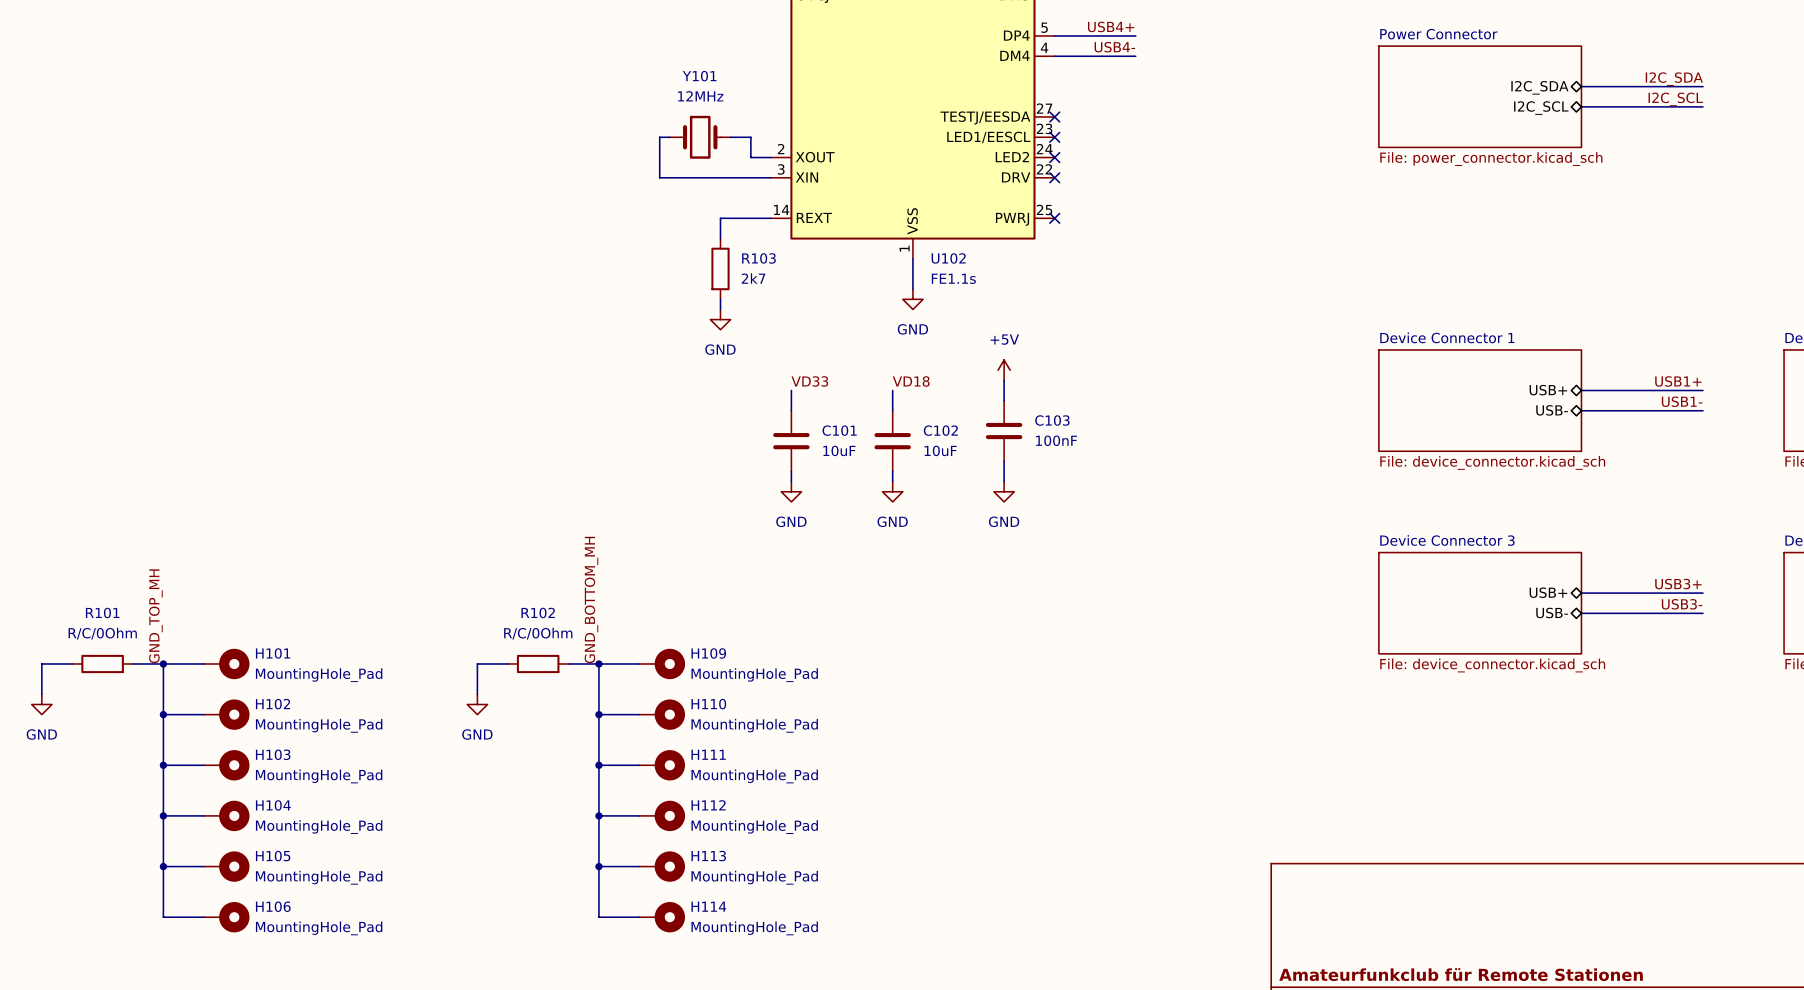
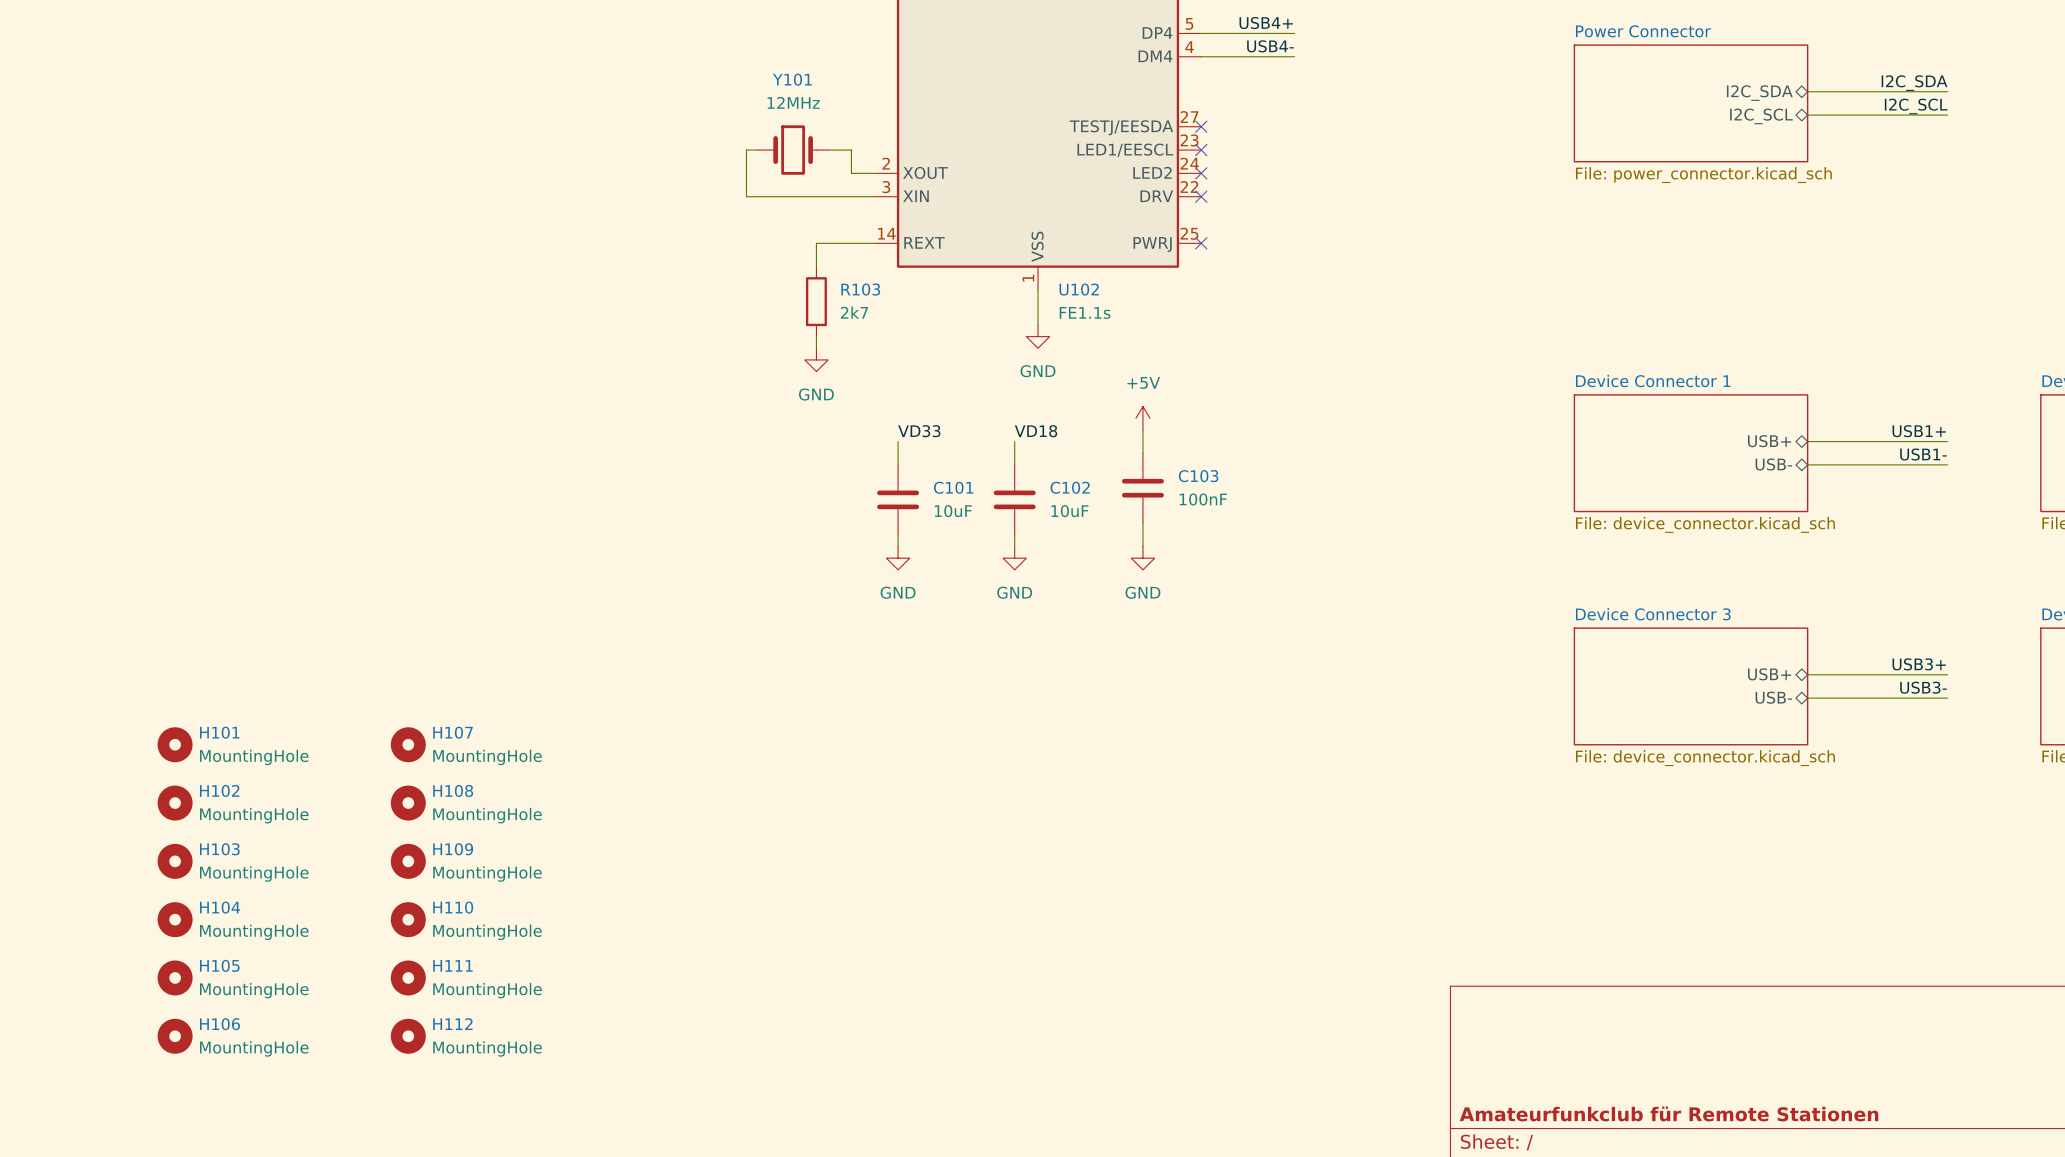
label: GND_BOTTOM_MH (591, 600) -> none
label: GND_TOP_MH (155, 616) -> none
H101 symbol: [203, 648, 250, 680] -> [157, 727, 193, 763]
H109 symbol: [639, 648, 686, 680] -> [390, 843, 426, 879]
H107: none -> MountingHole (408, 744)
wire: (72, 663) (41, 663) (41, 694) -> none
R101: R/C/0Ohm (102, 663) -> none
wire: (133, 663) (203, 663) -> none
wire: (163, 663) (163, 917) (203, 917) -> none
junction: (163, 663) -> none
wire: (507, 663) (477, 663) (477, 694) -> none
R102: R/C/0Ohm (538, 663) -> none
wire: (568, 663) (639, 663) -> none
wire: (598, 663) (598, 917) (639, 917) -> none
junction: (598, 663) -> none
H101 value: MountingHole_Pad (319, 675) -> MountingHole (254, 757)
H109 value: MountingHole_Pad (754, 675) -> MountingHole (487, 874)
H102 symbol: [203, 699, 250, 730] -> [157, 785, 193, 821]
H110 symbol: [639, 699, 686, 730] -> [390, 902, 426, 938]
power symbol: GND (41, 704) -> none
H108: none -> MountingHole (408, 803)
power symbol: GND (477, 704) -> none
wire: (163, 714) (203, 714) -> none
junction: (163, 714) -> none
wire: (598, 714) (639, 714) -> none
junction: (598, 714) -> none
H102 value: MountingHole_Pad (319, 725) -> MountingHole (254, 815)
H110 value: MountingHole_Pad (754, 725) -> MountingHole (487, 932)
H103 symbol: [203, 750, 250, 781] -> [157, 843, 193, 879]
H111 symbol: [639, 750, 686, 781] -> [390, 960, 426, 996]
wire: (163, 765) (203, 765) -> none
junction: (163, 765) -> none
wire: (598, 765) (639, 765) -> none
junction: (598, 765) -> none
H103 value: MountingHole_Pad (319, 776) -> MountingHole (254, 874)
H111 value: MountingHole_Pad (754, 776) -> MountingHole (487, 990)
H104 symbol: [203, 800, 250, 832] -> [157, 902, 193, 938]
H112 symbol: [639, 800, 686, 832] -> [390, 1018, 426, 1054]
wire: (163, 815) (203, 815) -> none
junction: (163, 815) -> none
wire: (598, 815) (639, 815) -> none
junction: (598, 815) -> none
H104 value: MountingHole_Pad (319, 827) -> MountingHole (254, 932)
H112 value: MountingHole_Pad (754, 827) -> MountingHole (487, 1048)
H105 symbol: [203, 851, 250, 882] -> [157, 960, 193, 996]
wire: (163, 866) (203, 866) -> none
junction: (163, 866) -> none
wire: (598, 866) (639, 866) -> none
junction: (598, 866) -> none
H113: MountingHole_Pad (662, 866) -> none
H105 value: MountingHole_Pad (319, 877) -> MountingHole (254, 990)
H106 symbol: [203, 902, 250, 933] -> [157, 1018, 193, 1054]
H114: MountingHole_Pad (662, 917) -> none
H106 value: MountingHole_Pad (319, 928) -> MountingHole (254, 1048)

